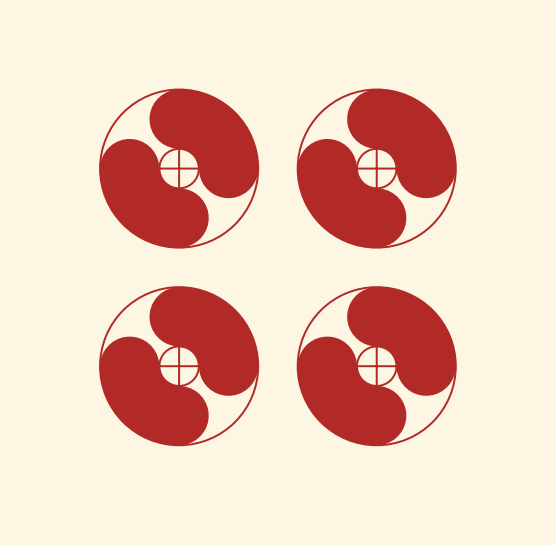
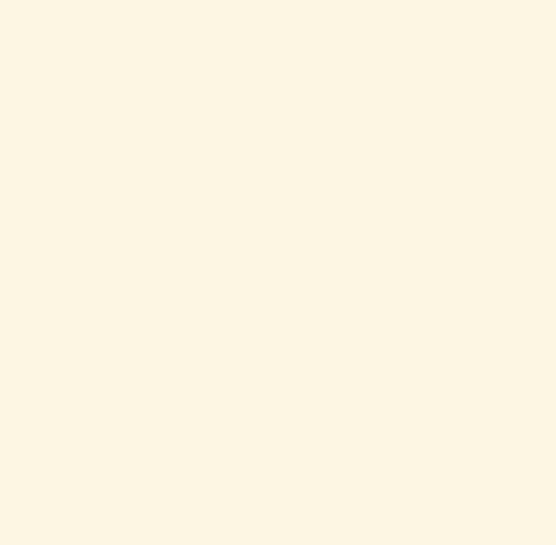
part: (179, 168) -> none
part: (376, 168) -> none
part: (179, 366) -> none
part: (376, 366) -> none

